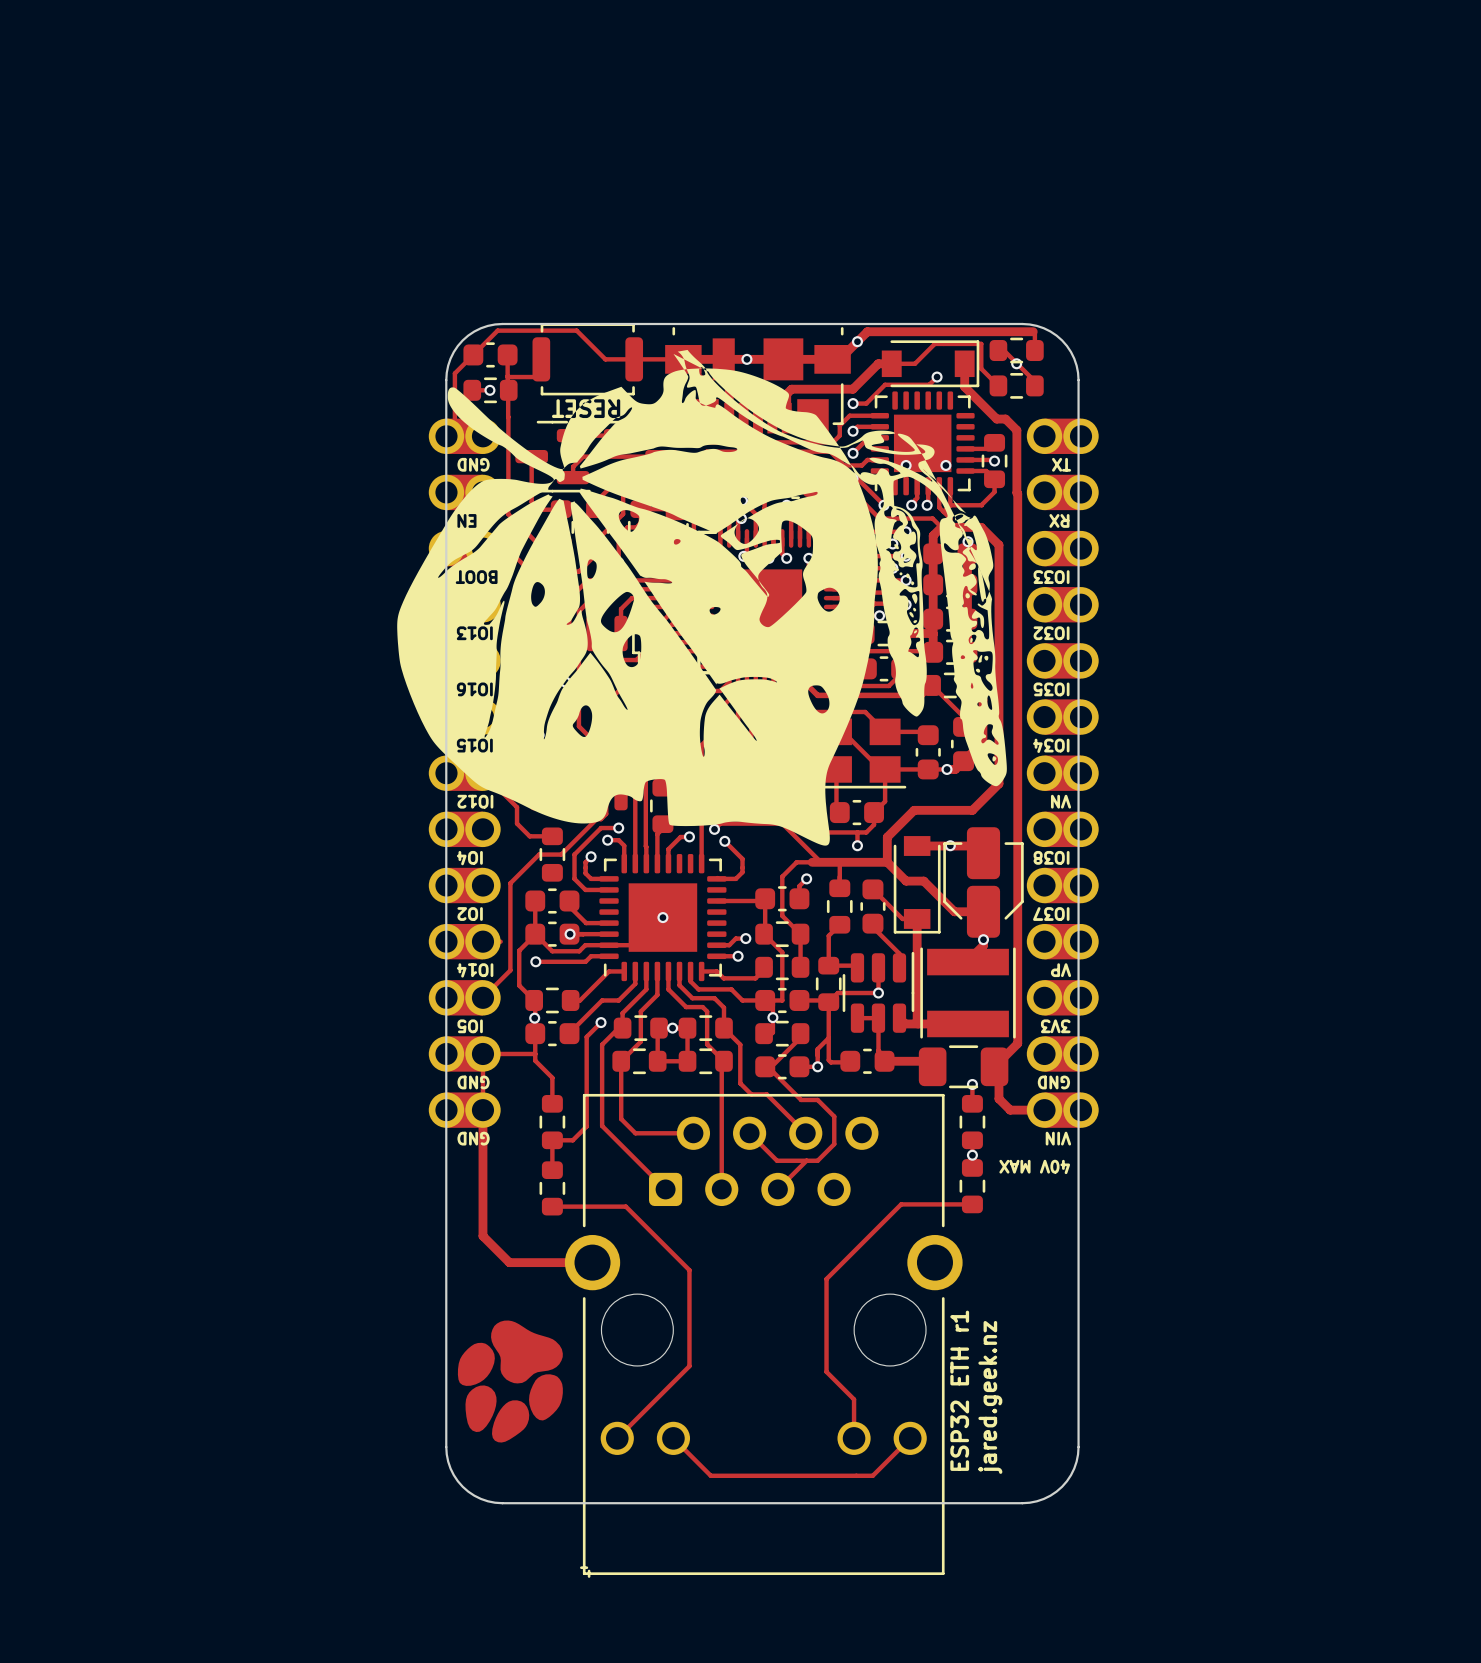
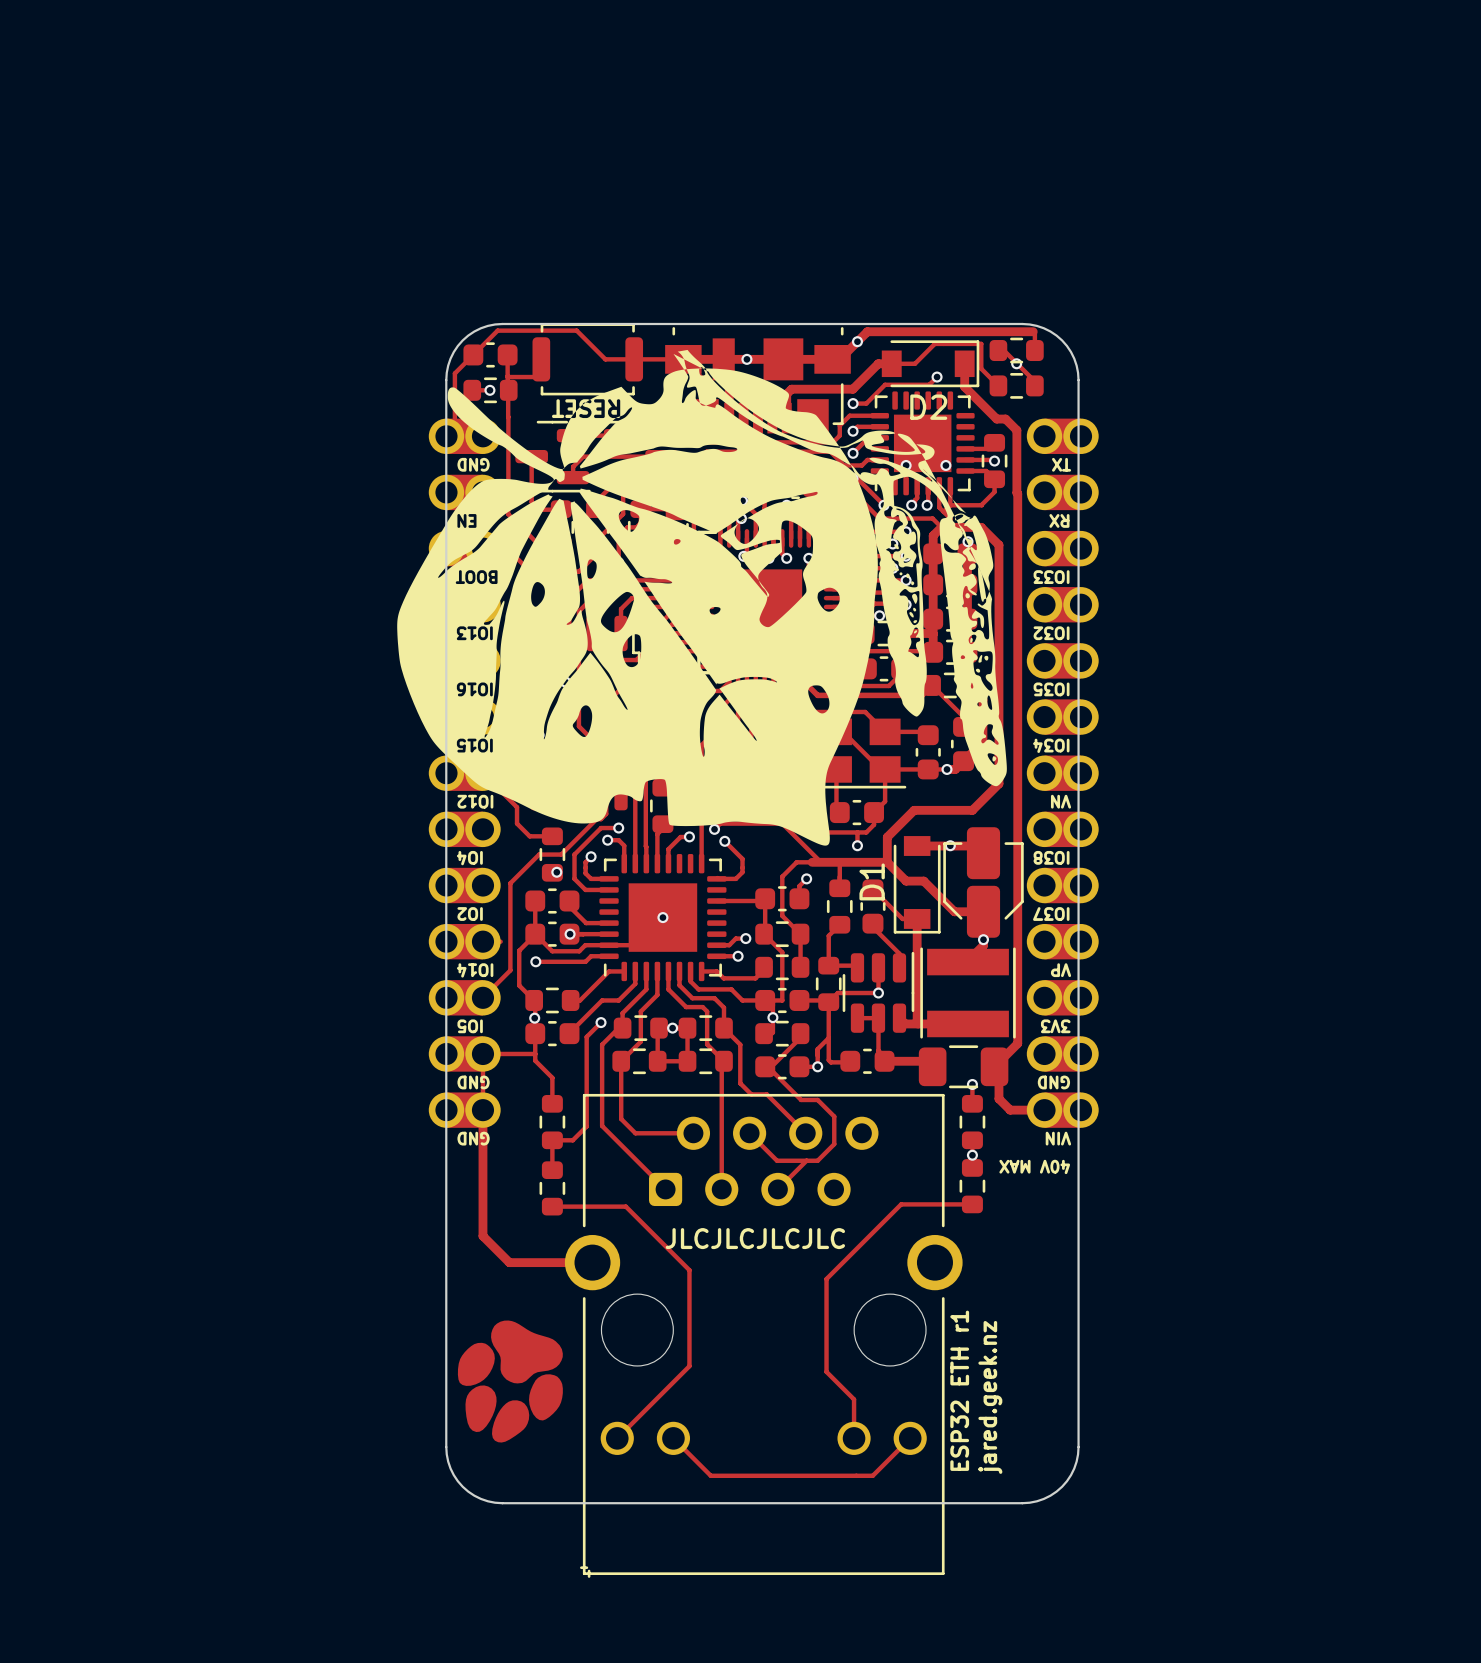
D2 name: none -> D2 (928, 407)
via: none -> (556, 872)
D1 name: none -> D1 (872, 881)
text: none -> JLCJLCJLCJLC (755, 1238)

